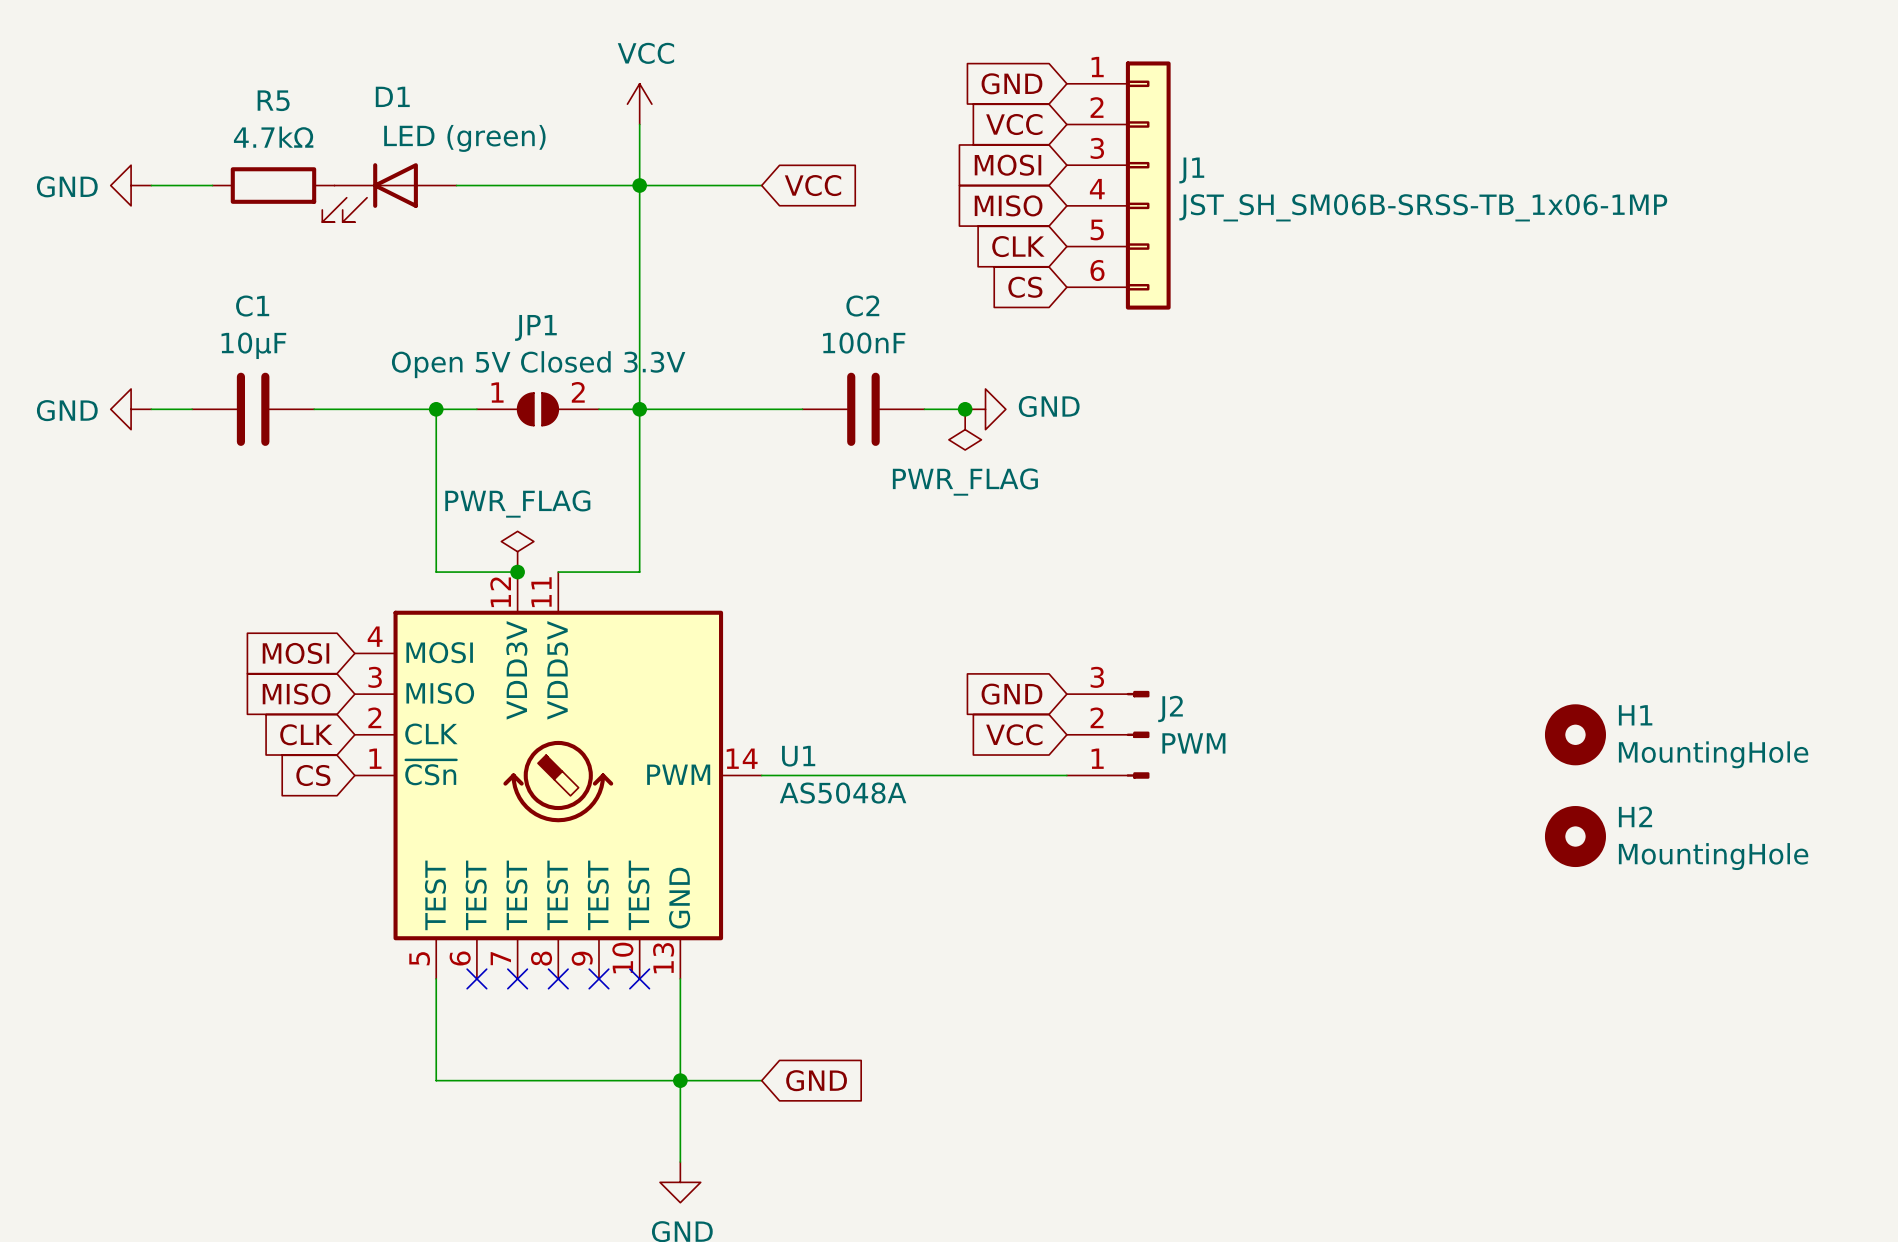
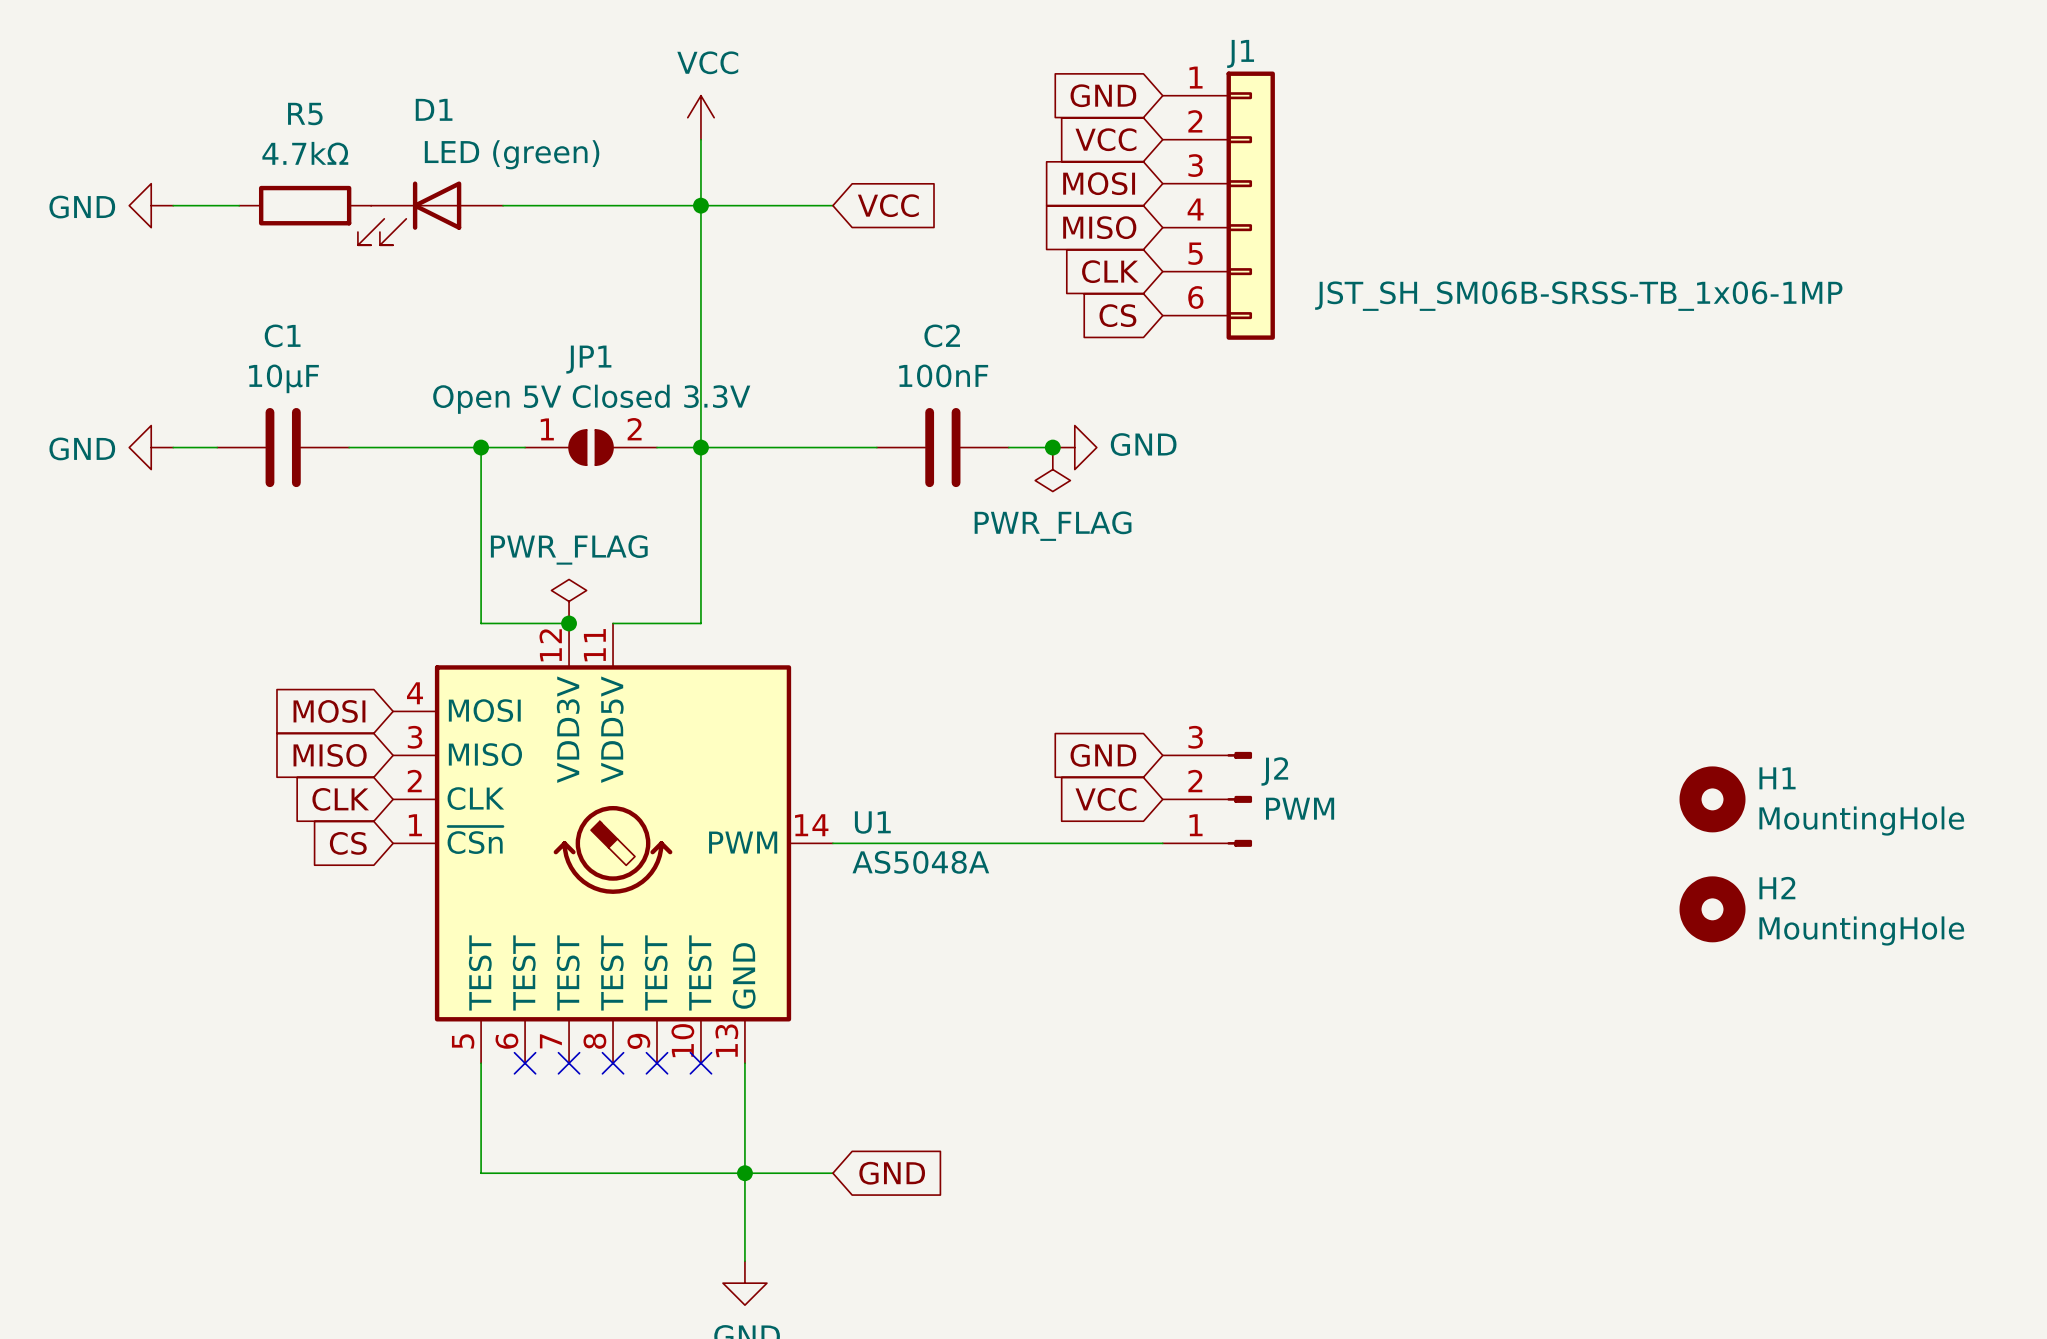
J1 name position: J1 (1191, 170) -> J1 (1240, 53)
J1 value position: JST_SH_SM06B-SRSS-TB_1x06-1MP (1423, 207) -> JST_SH_SM06B-SRSS-TB_1x06-1MP (1578, 296)

